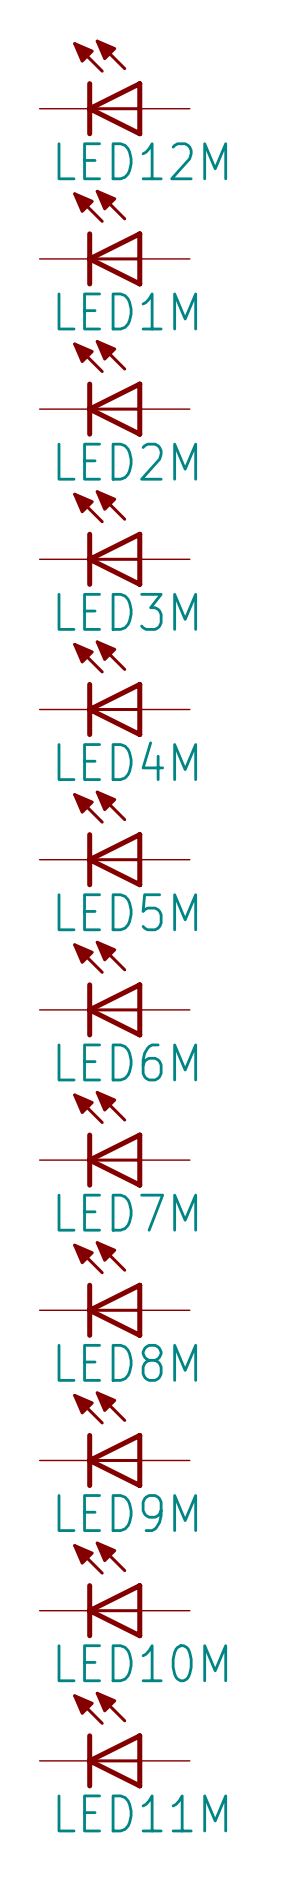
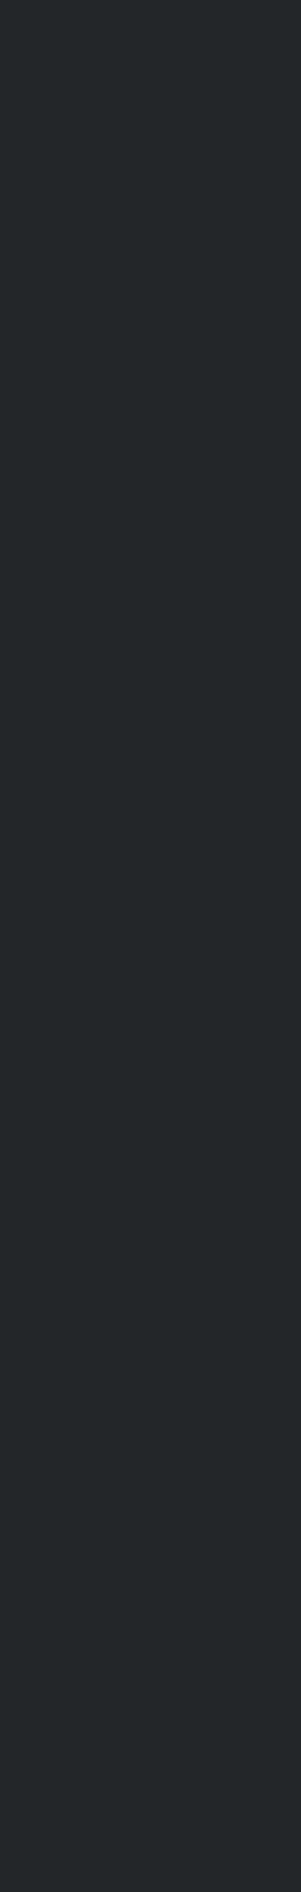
LED12M: (114, 87) -> none
LED1M: (114, 238) -> none
LED2M: (114, 388) -> none
LED3M: (114, 538) -> none
LED4M: (114, 688) -> none
LED5M: (114, 838) -> none
LED6M: (114, 989) -> none
LED7M: (114, 1139) -> none
LED8M: (114, 1289) -> none
LED9M: (114, 1439) -> none
LED10M: (114, 1589) -> none
LED11M: (114, 1740) -> none

